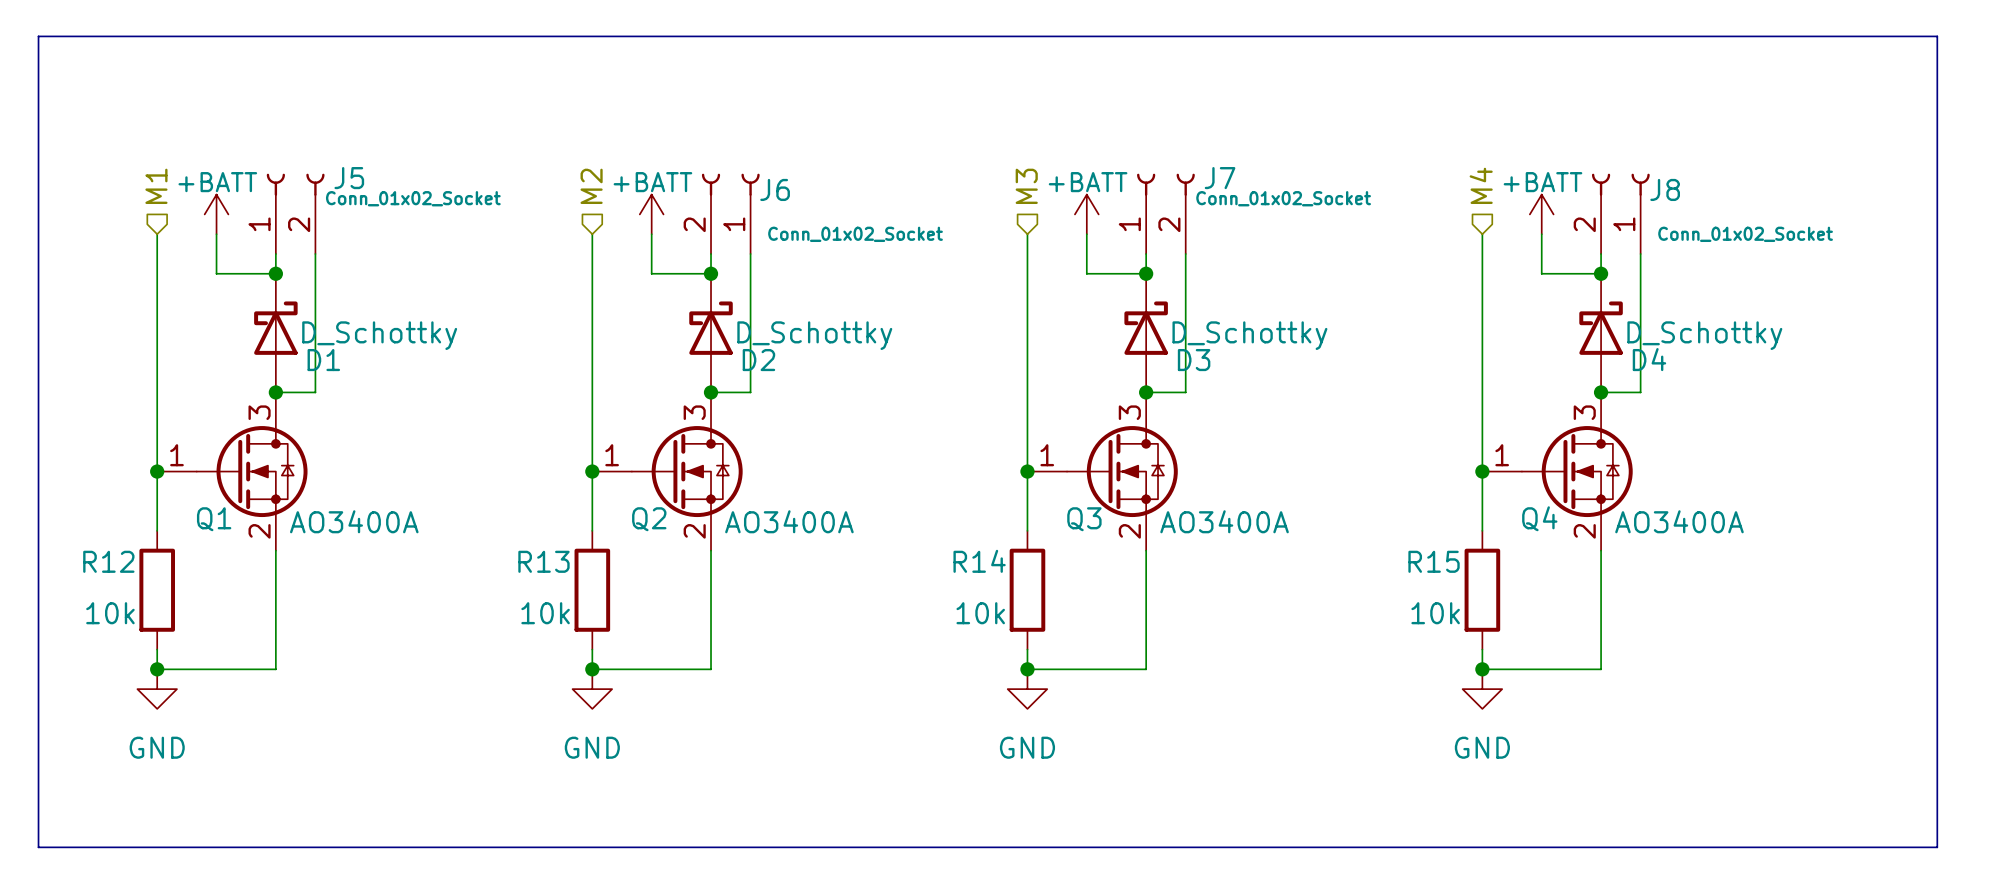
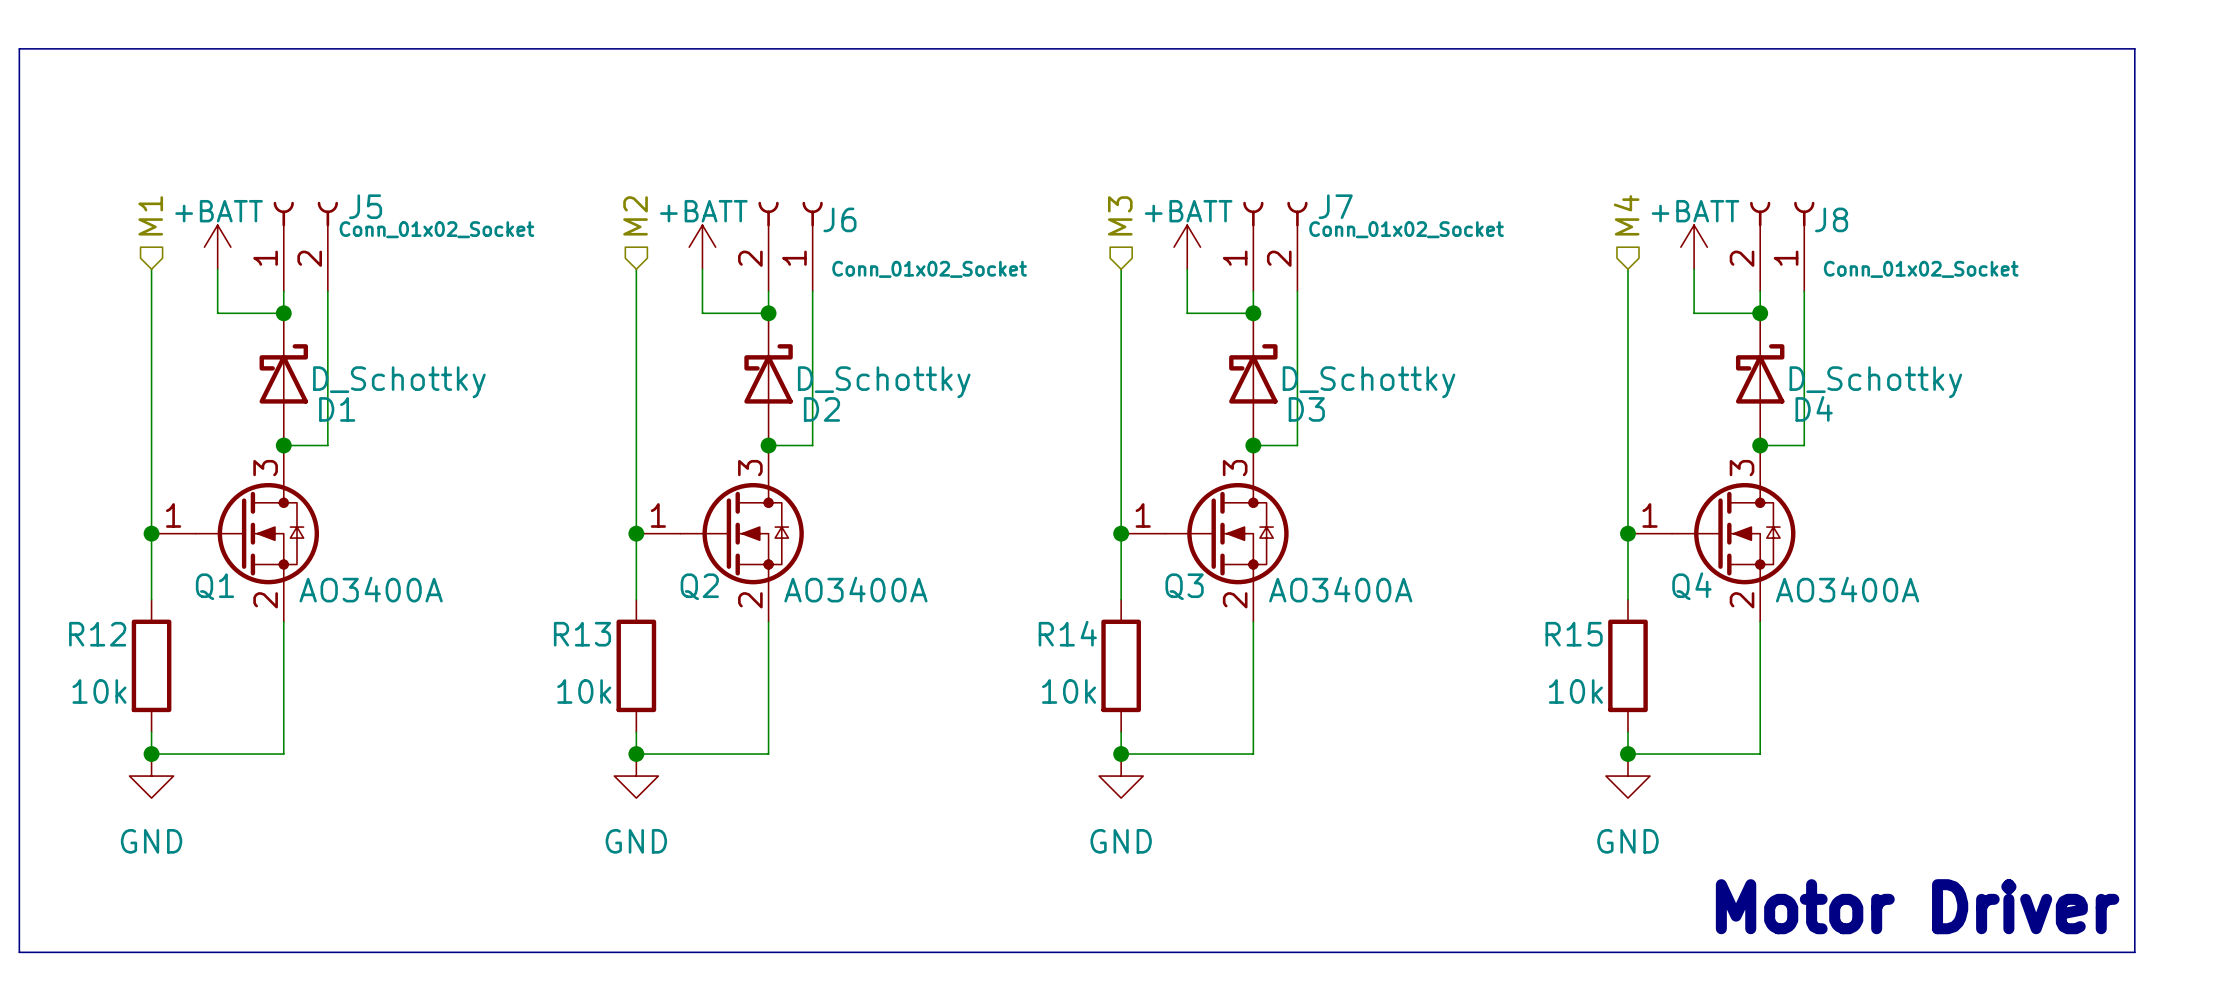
text: none -> Motor Driver (1917, 906)

